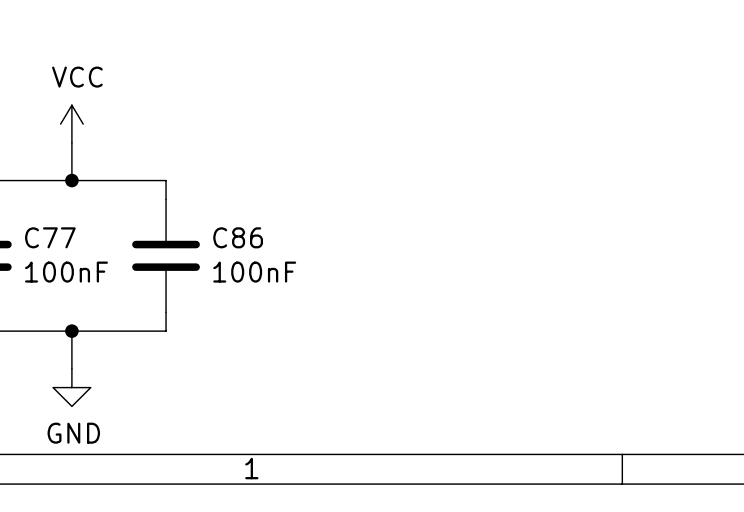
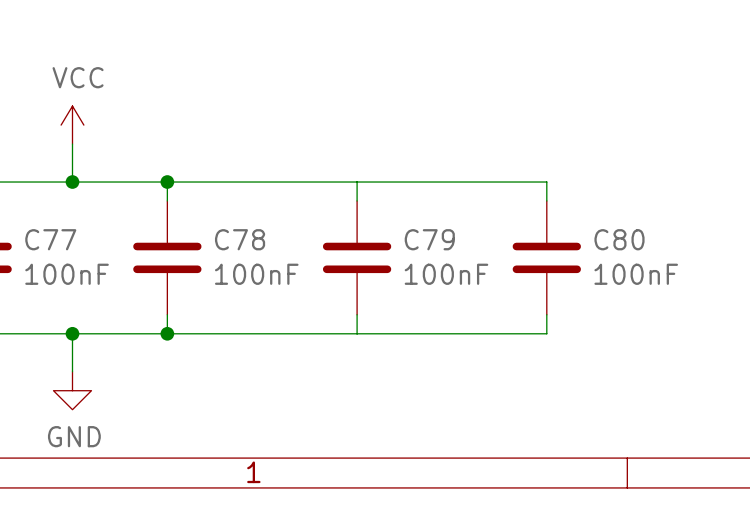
wire: none -> (167, 182) (546, 182) (546, 200)
junction: none -> (167, 182)
wire: none -> (357, 182) (357, 200)
C86 name: C86 (238, 237) -> C78 (240, 239)
C79: none -> 100nF (357, 257)
C80: none -> 100nF (546, 257)
wire: none -> (357, 314) (357, 333)
wire: none -> (546, 314) (546, 333) (167, 333)
junction: none -> (167, 333)

